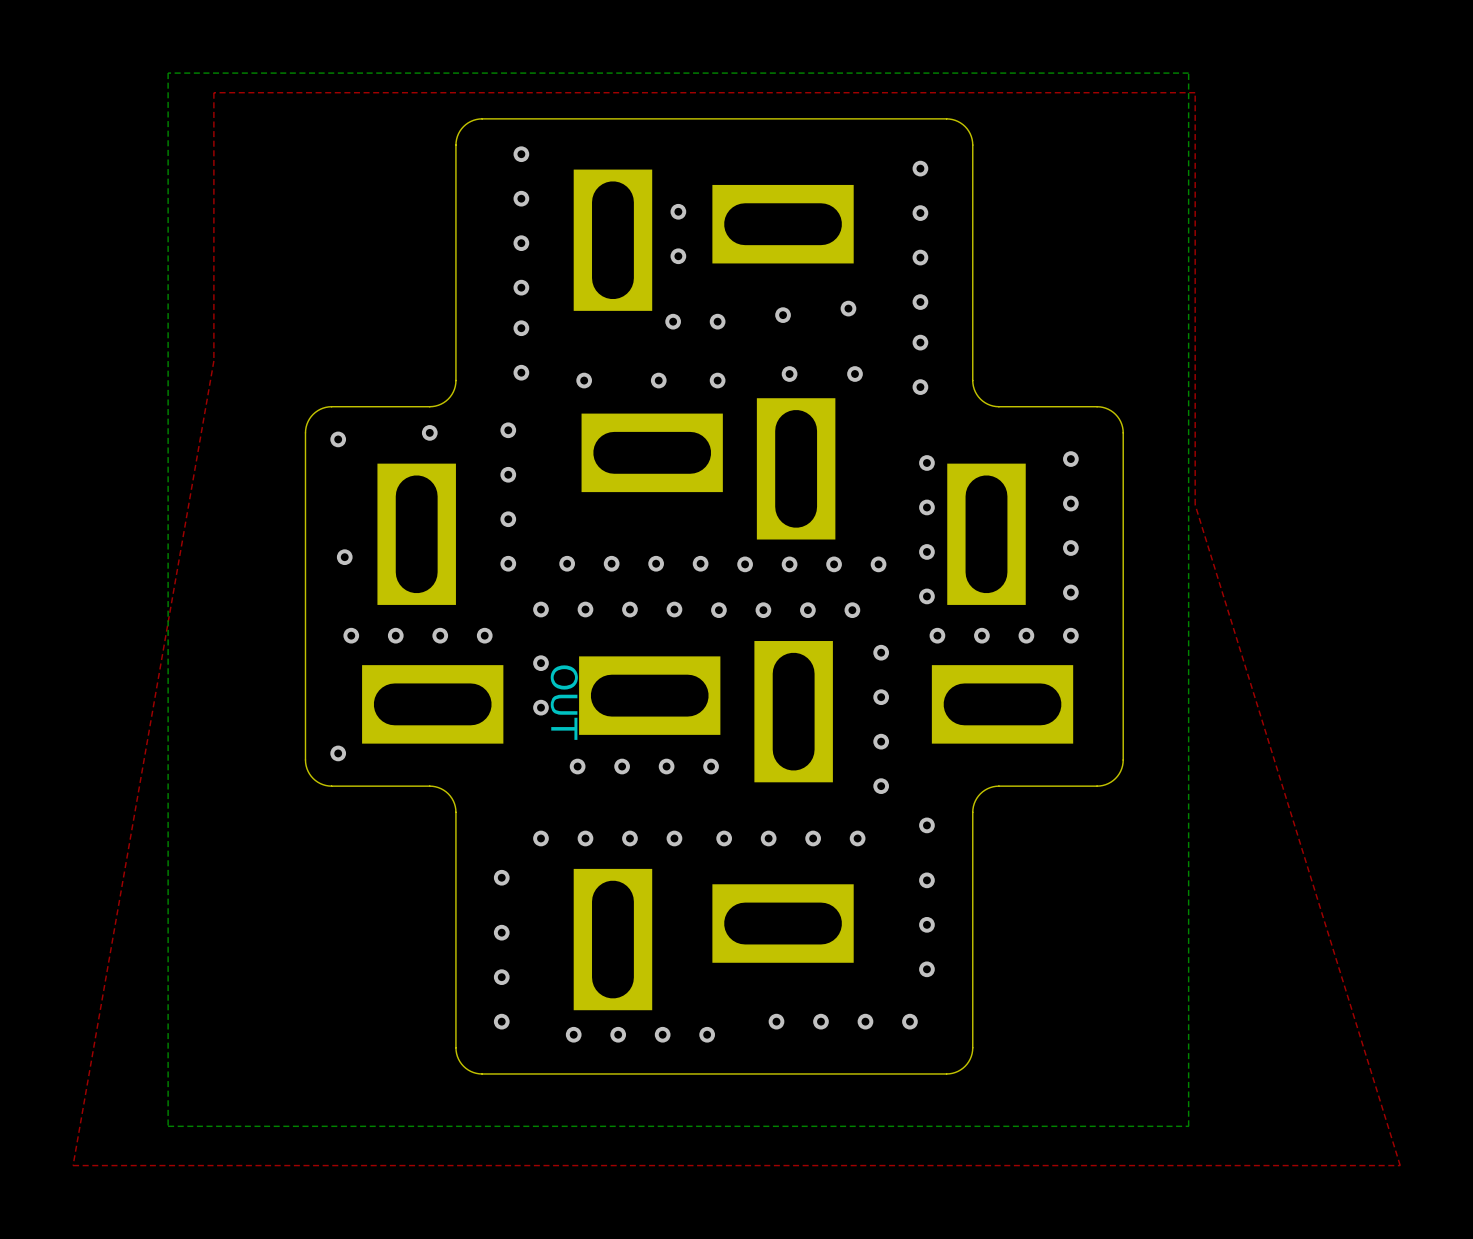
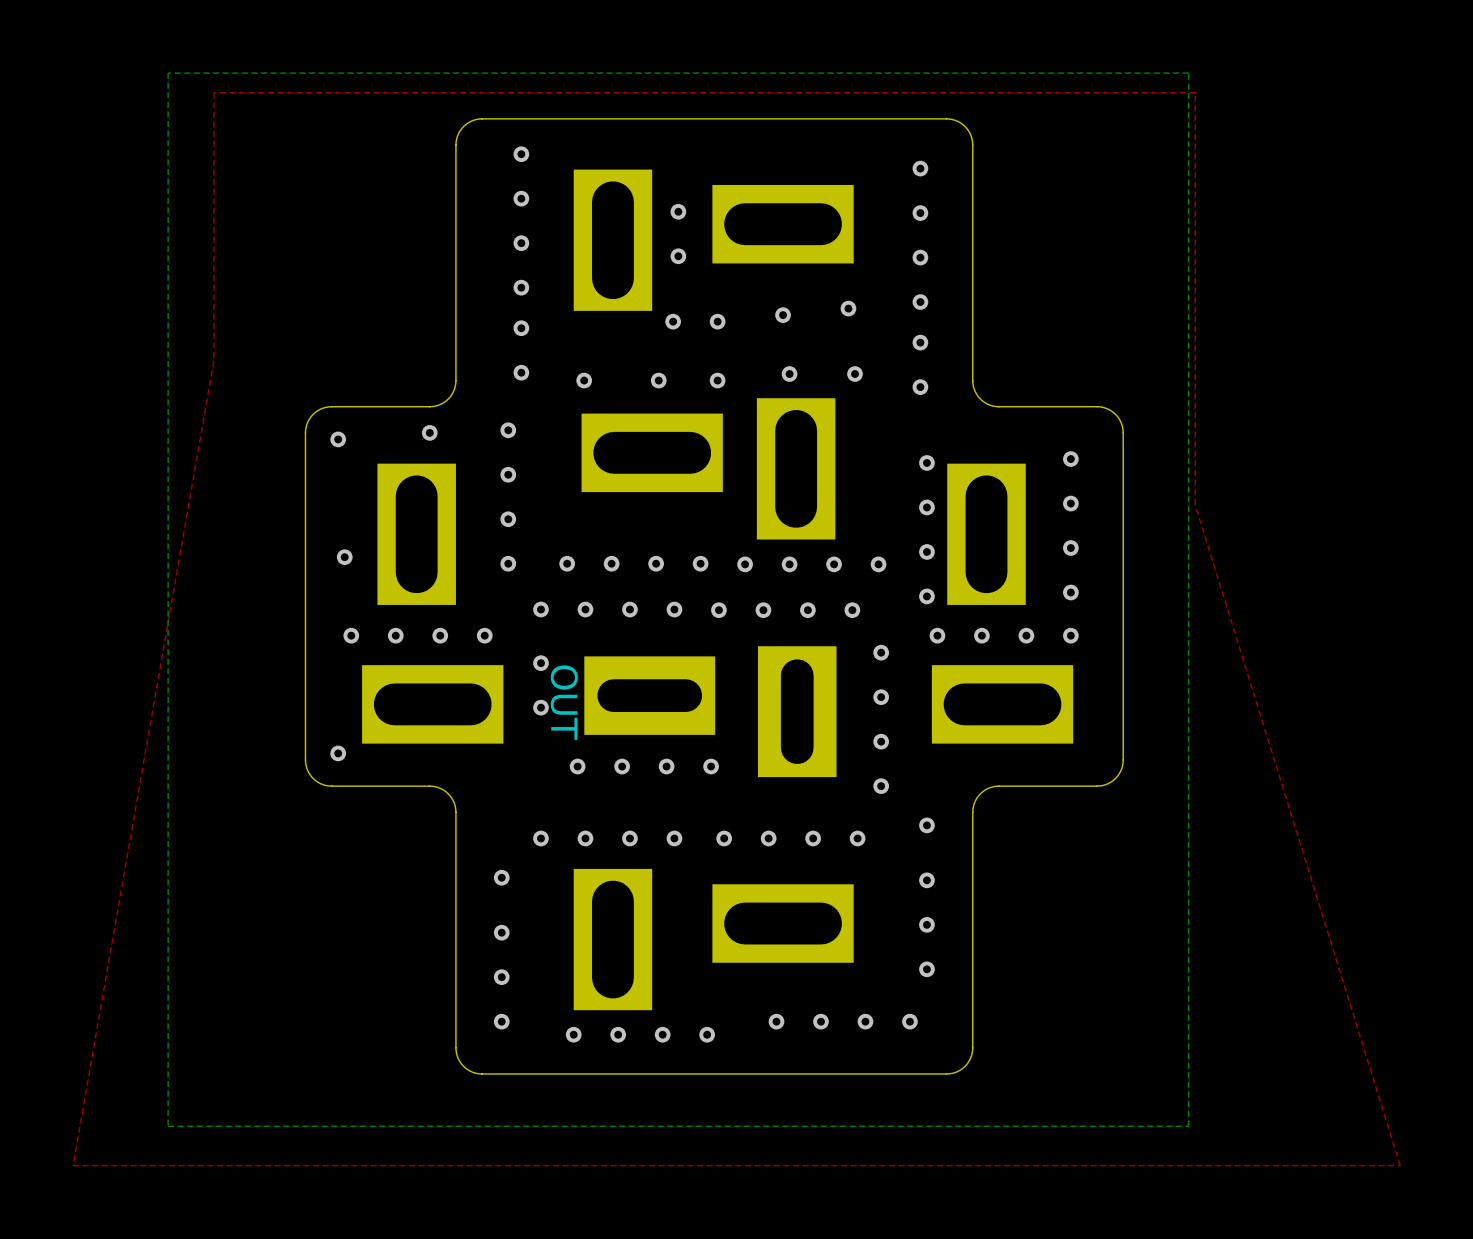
part footprint: [579, 641, 833, 783] -> [584, 646, 837, 778]

